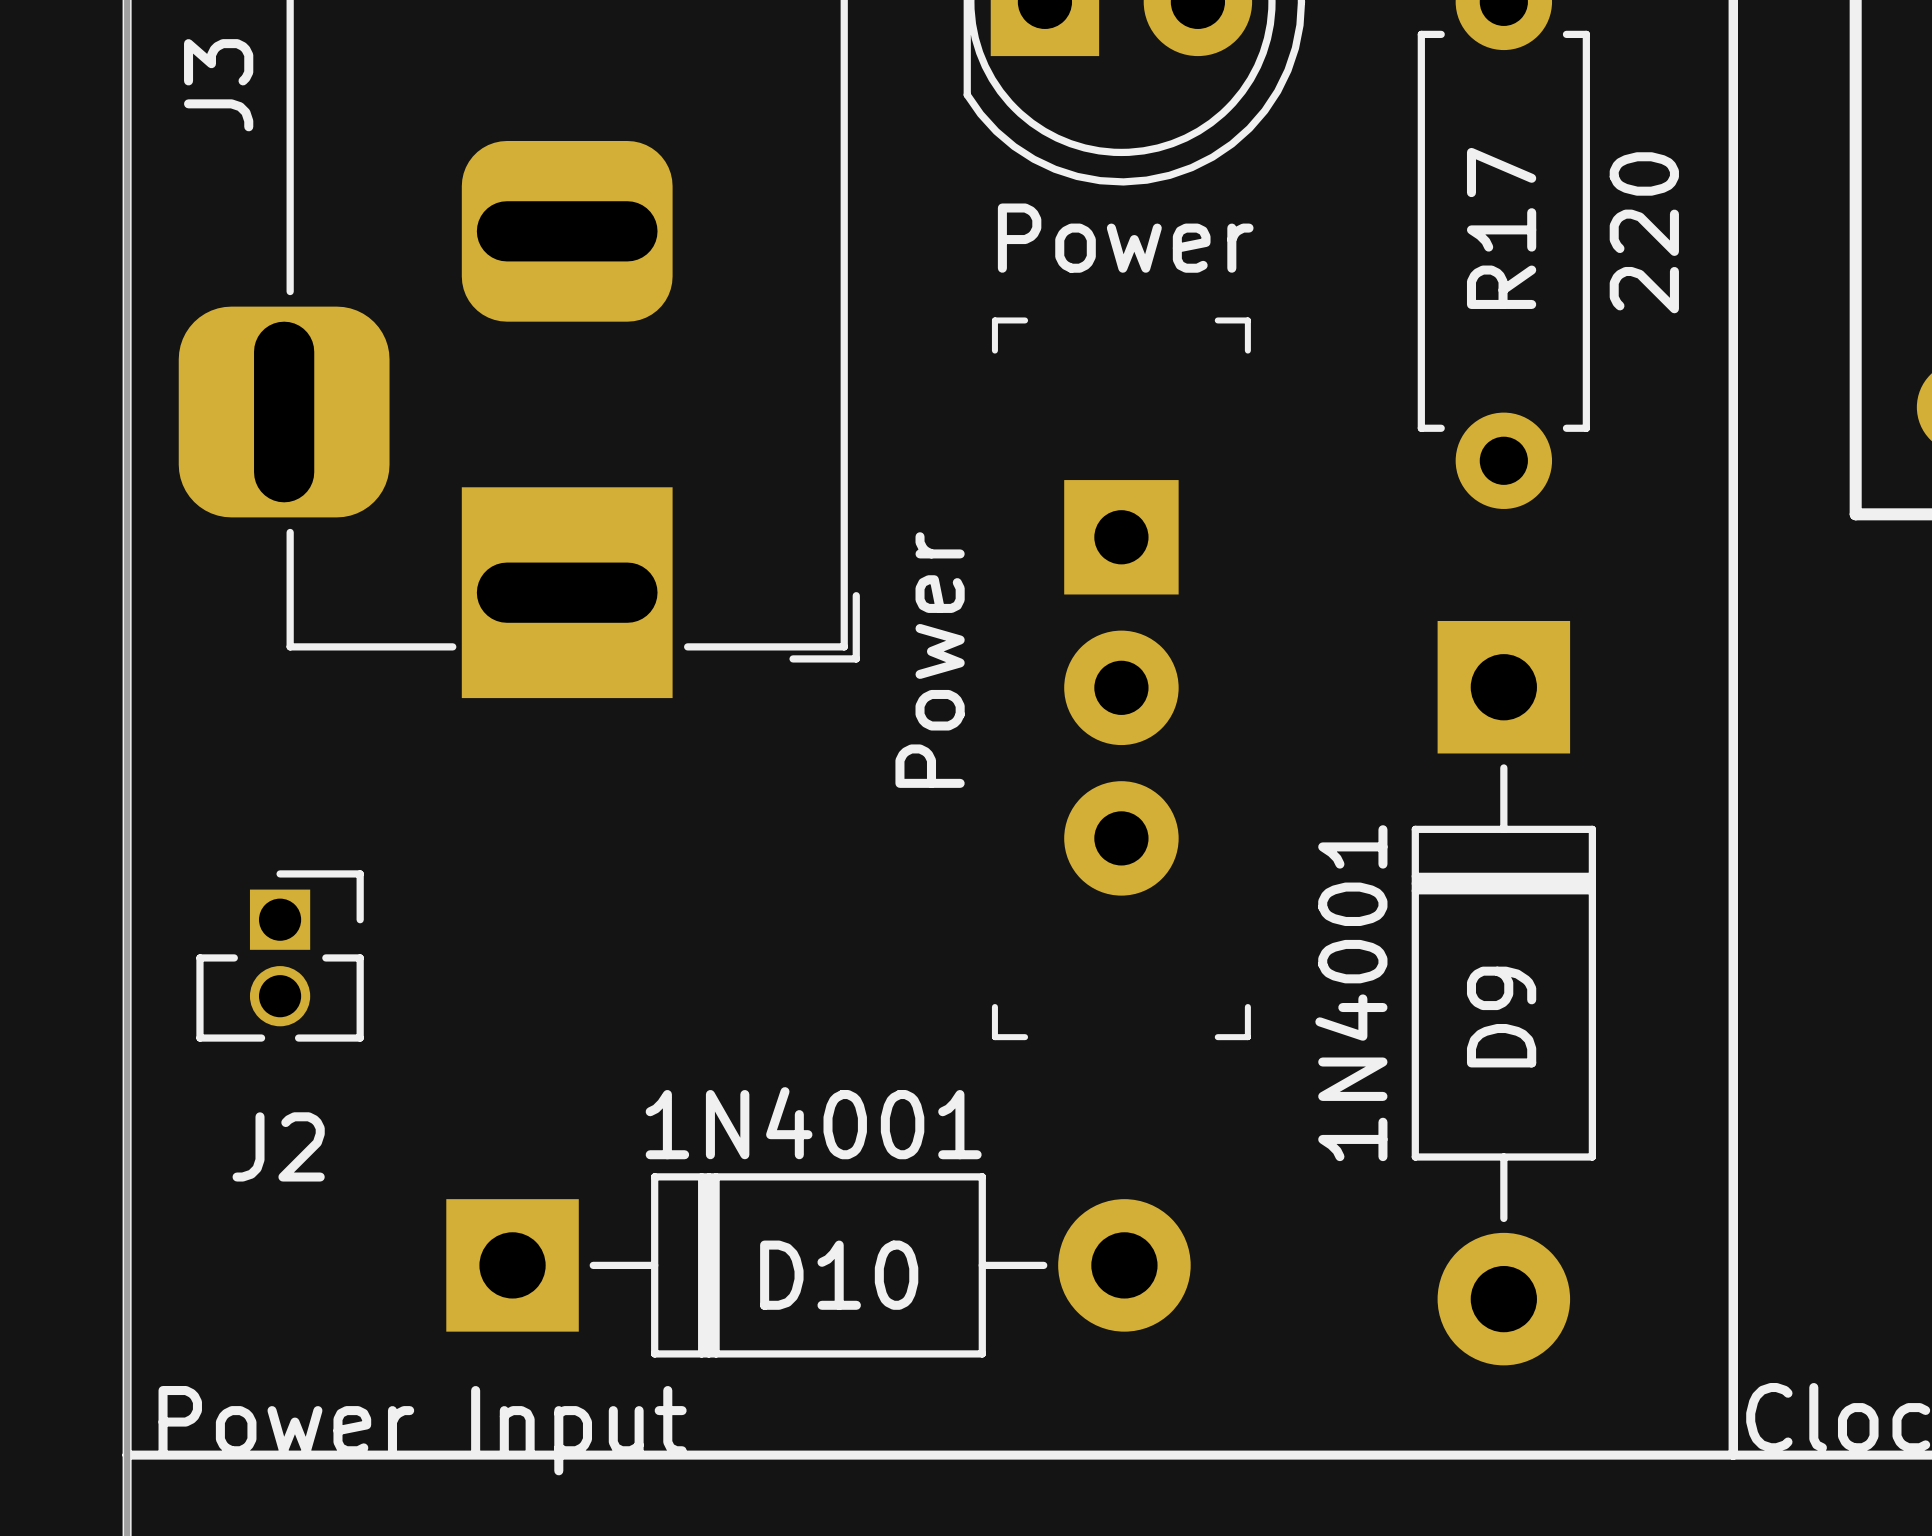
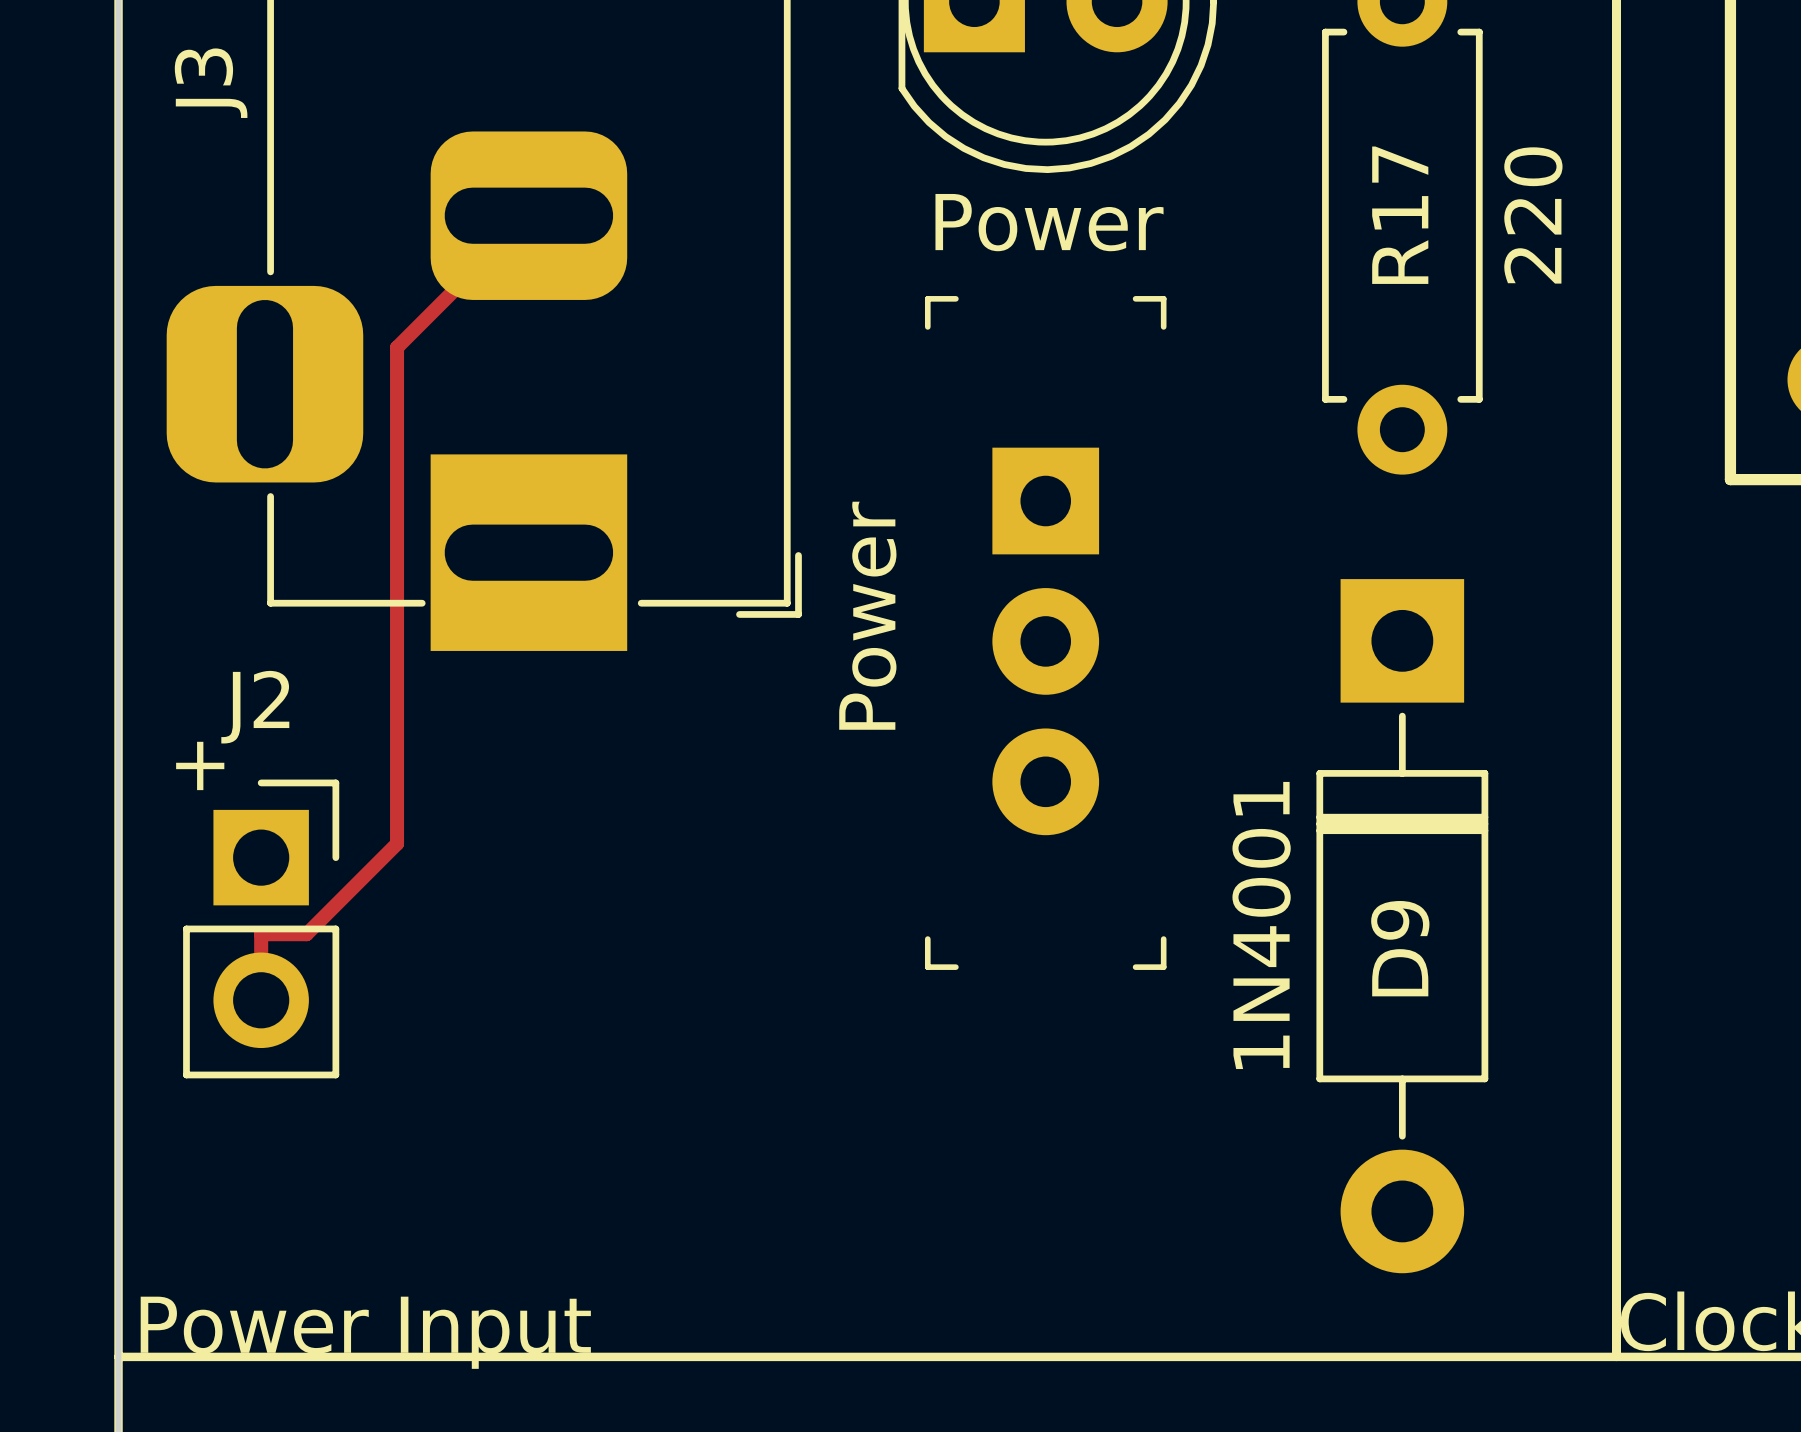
track: none -> (528, 215) (397, 347) (397, 843) (306, 934) (261, 934) (261, 1000)
text: none -> + (200, 765)
J2 footprint: [196, 870, 364, 1042] -> [183, 779, 340, 1079]
J2 name position: J2 (278, 1146) -> J2 (255, 707)
D10: 1N4001 (818, 1265) -> none

